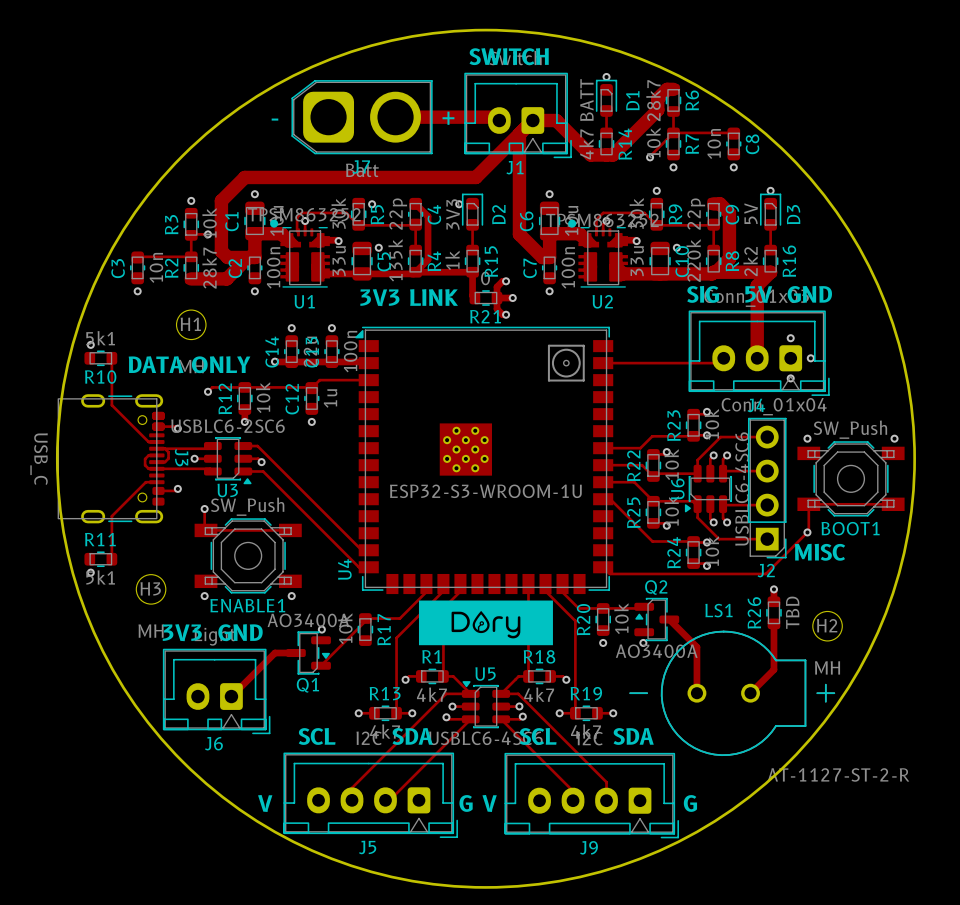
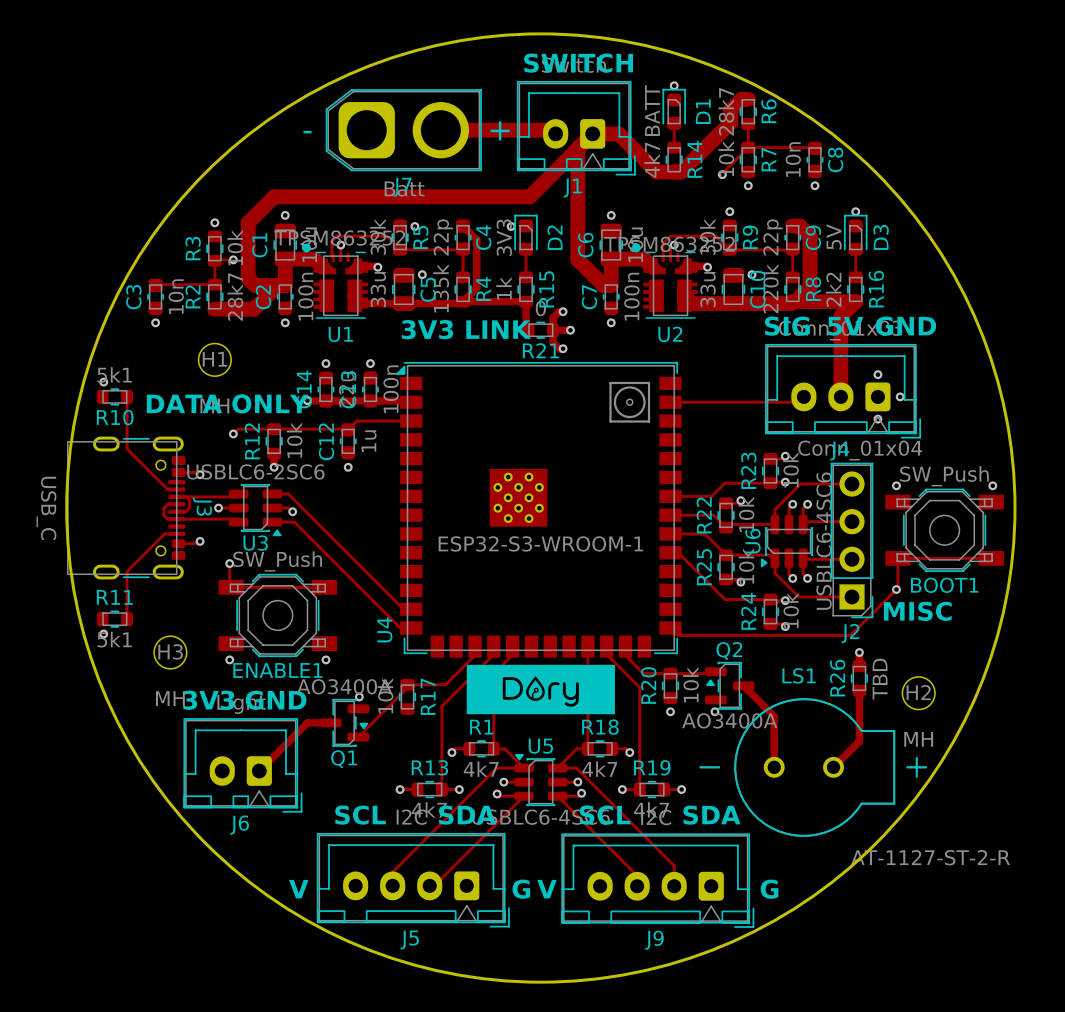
U4 value: ESP32-S3-WROOM-1U (485, 491) -> ESP32-S3-WROOM-1 (540, 543)

